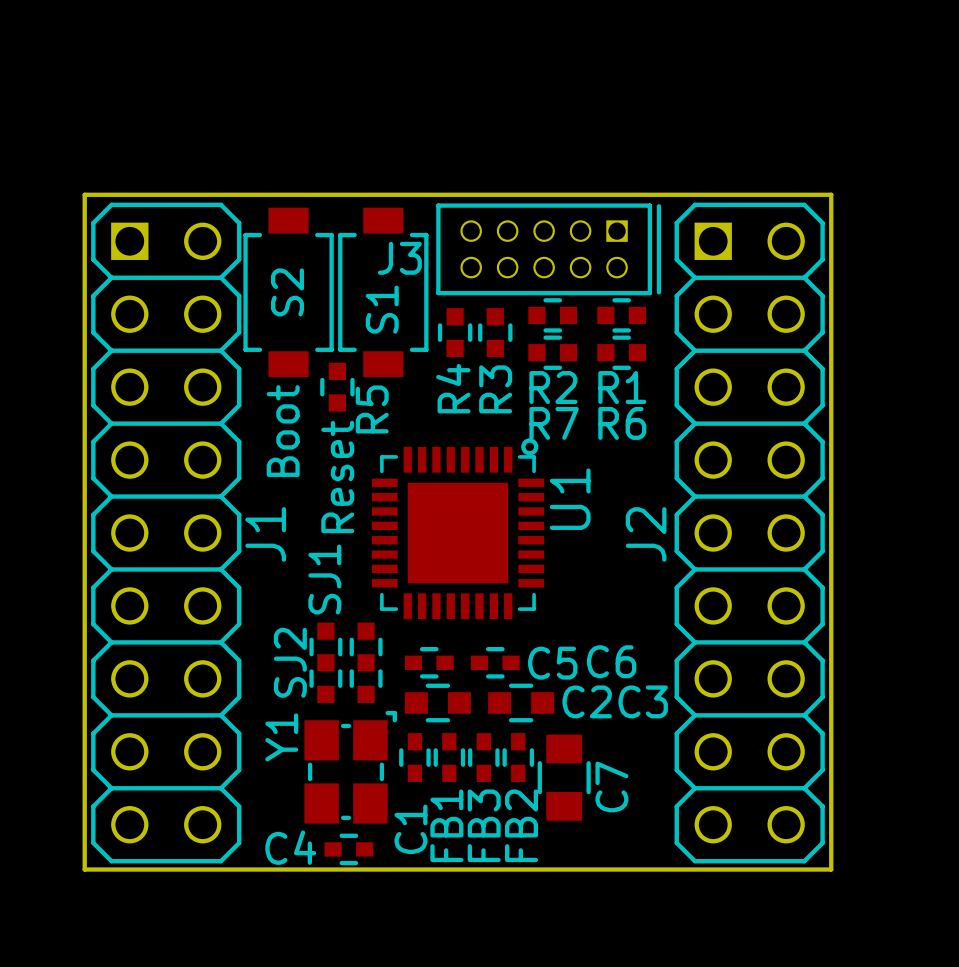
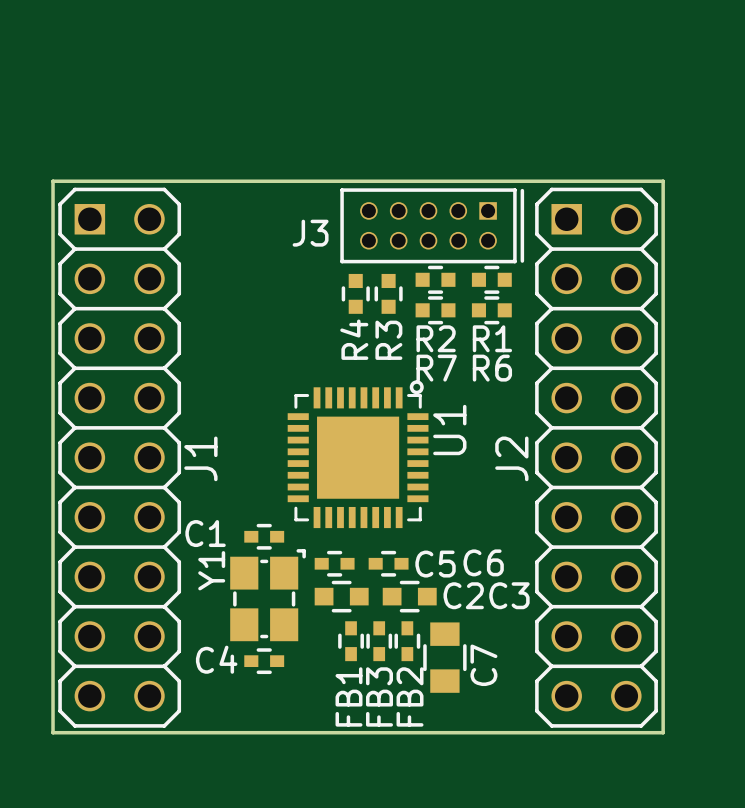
S2: Boot (288, 292) -> none
S1: Reset (383, 292) -> none
R5: (337, 387) -> none
SJ2: (325, 662) -> none
SJ1: (366, 662) -> none
C1 rotation: 0° (414, 757) -> 90° clockwise (264, 536)
C1 position: (414, 757) -> (264, 536)
Y1 position: (350, 767) -> (268, 595)
C4 position: (348, 849) -> (264, 661)

